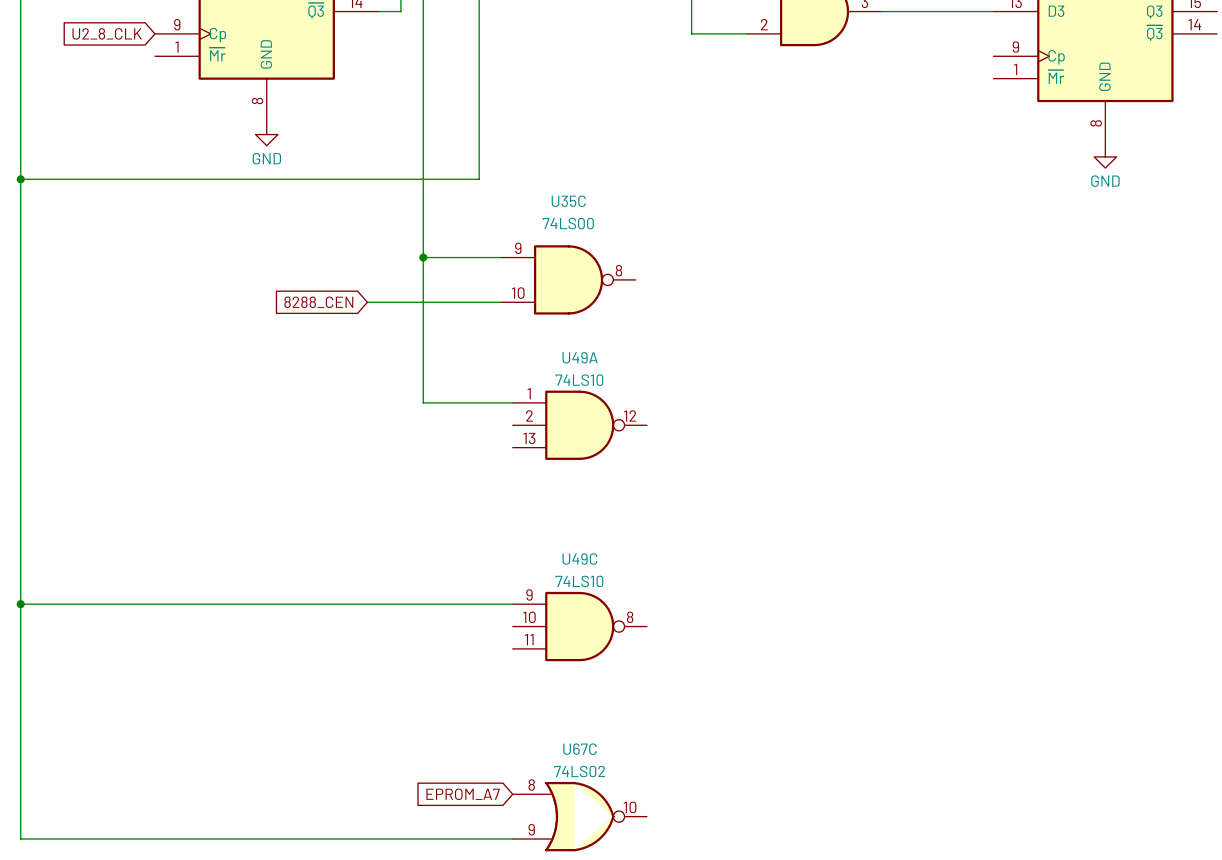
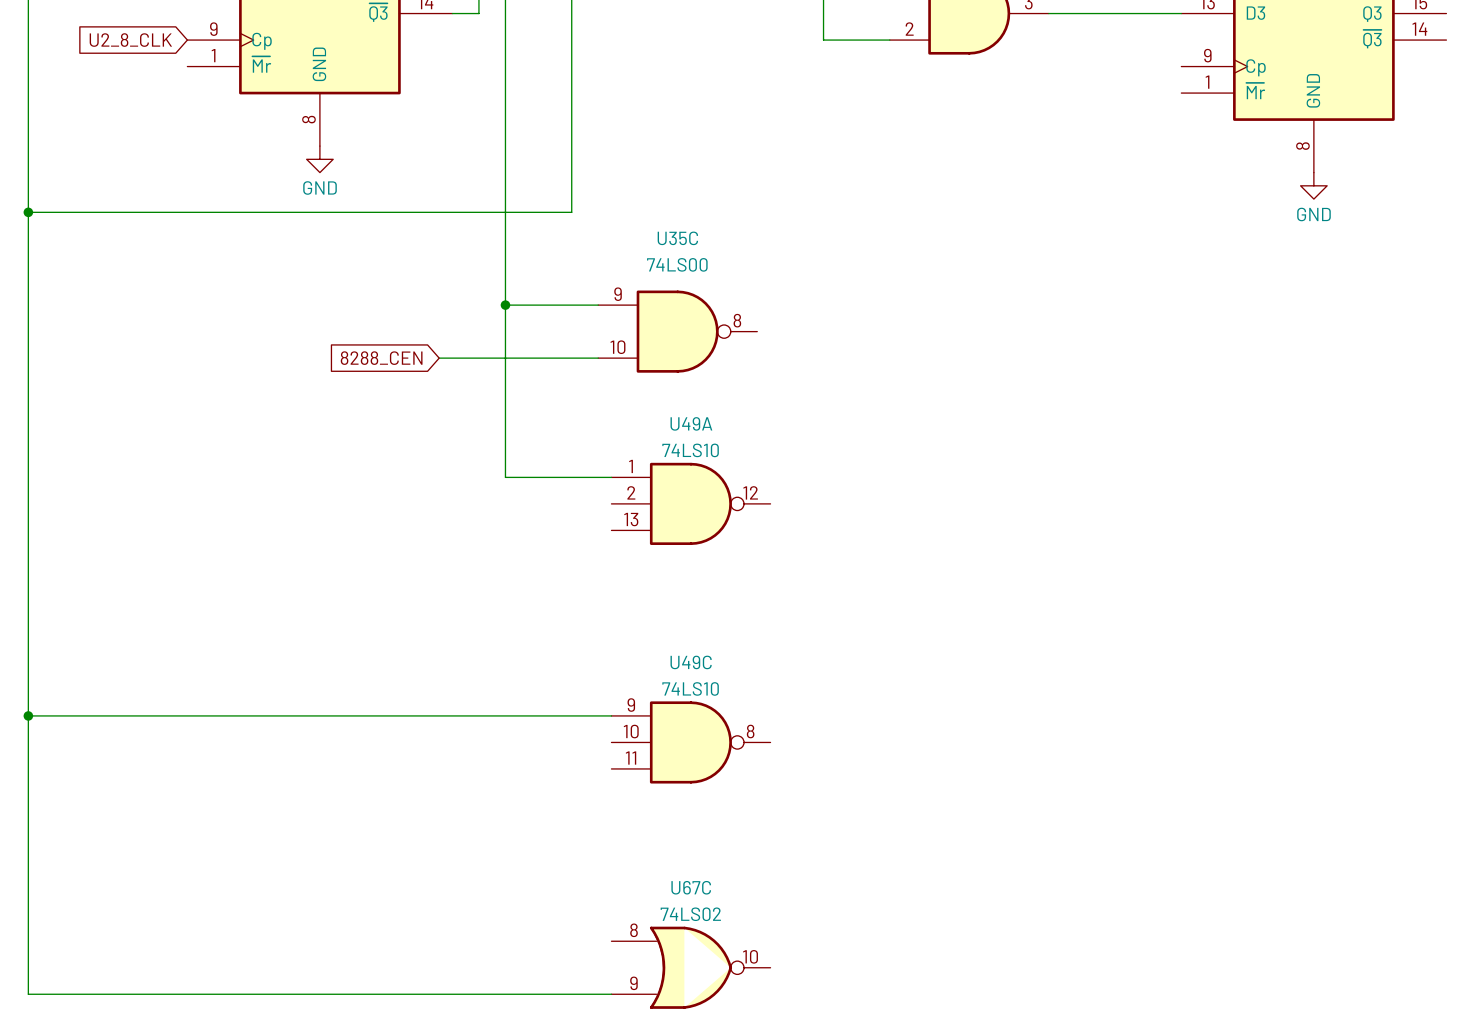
global label: EPROM_A7 (463, 794) -> none

